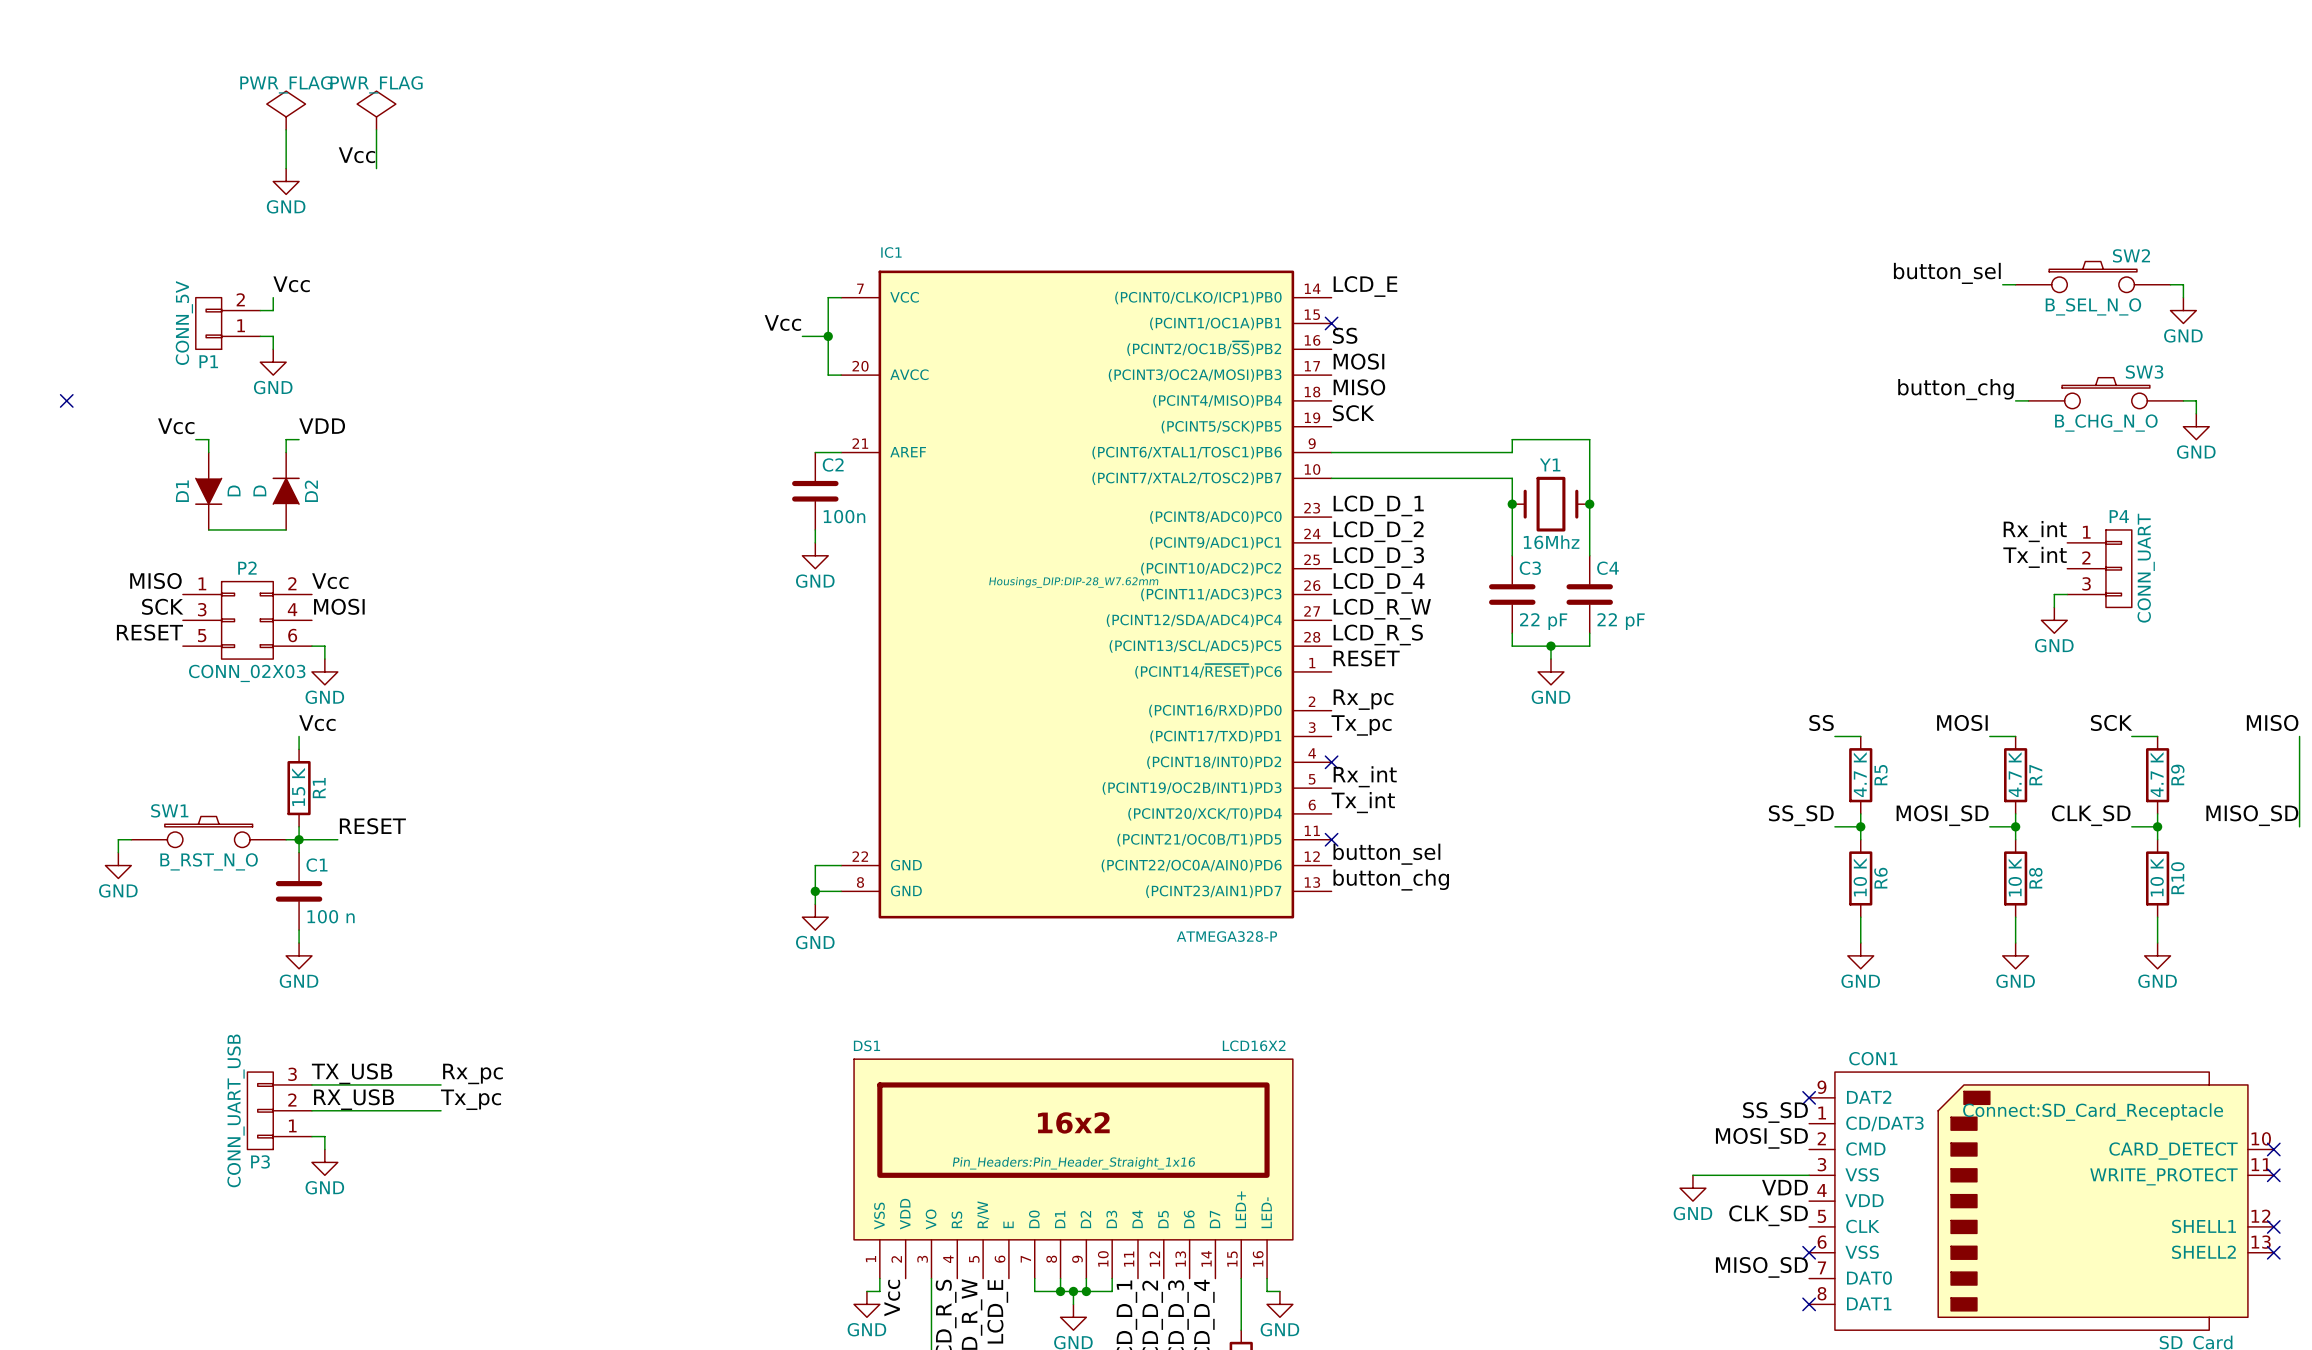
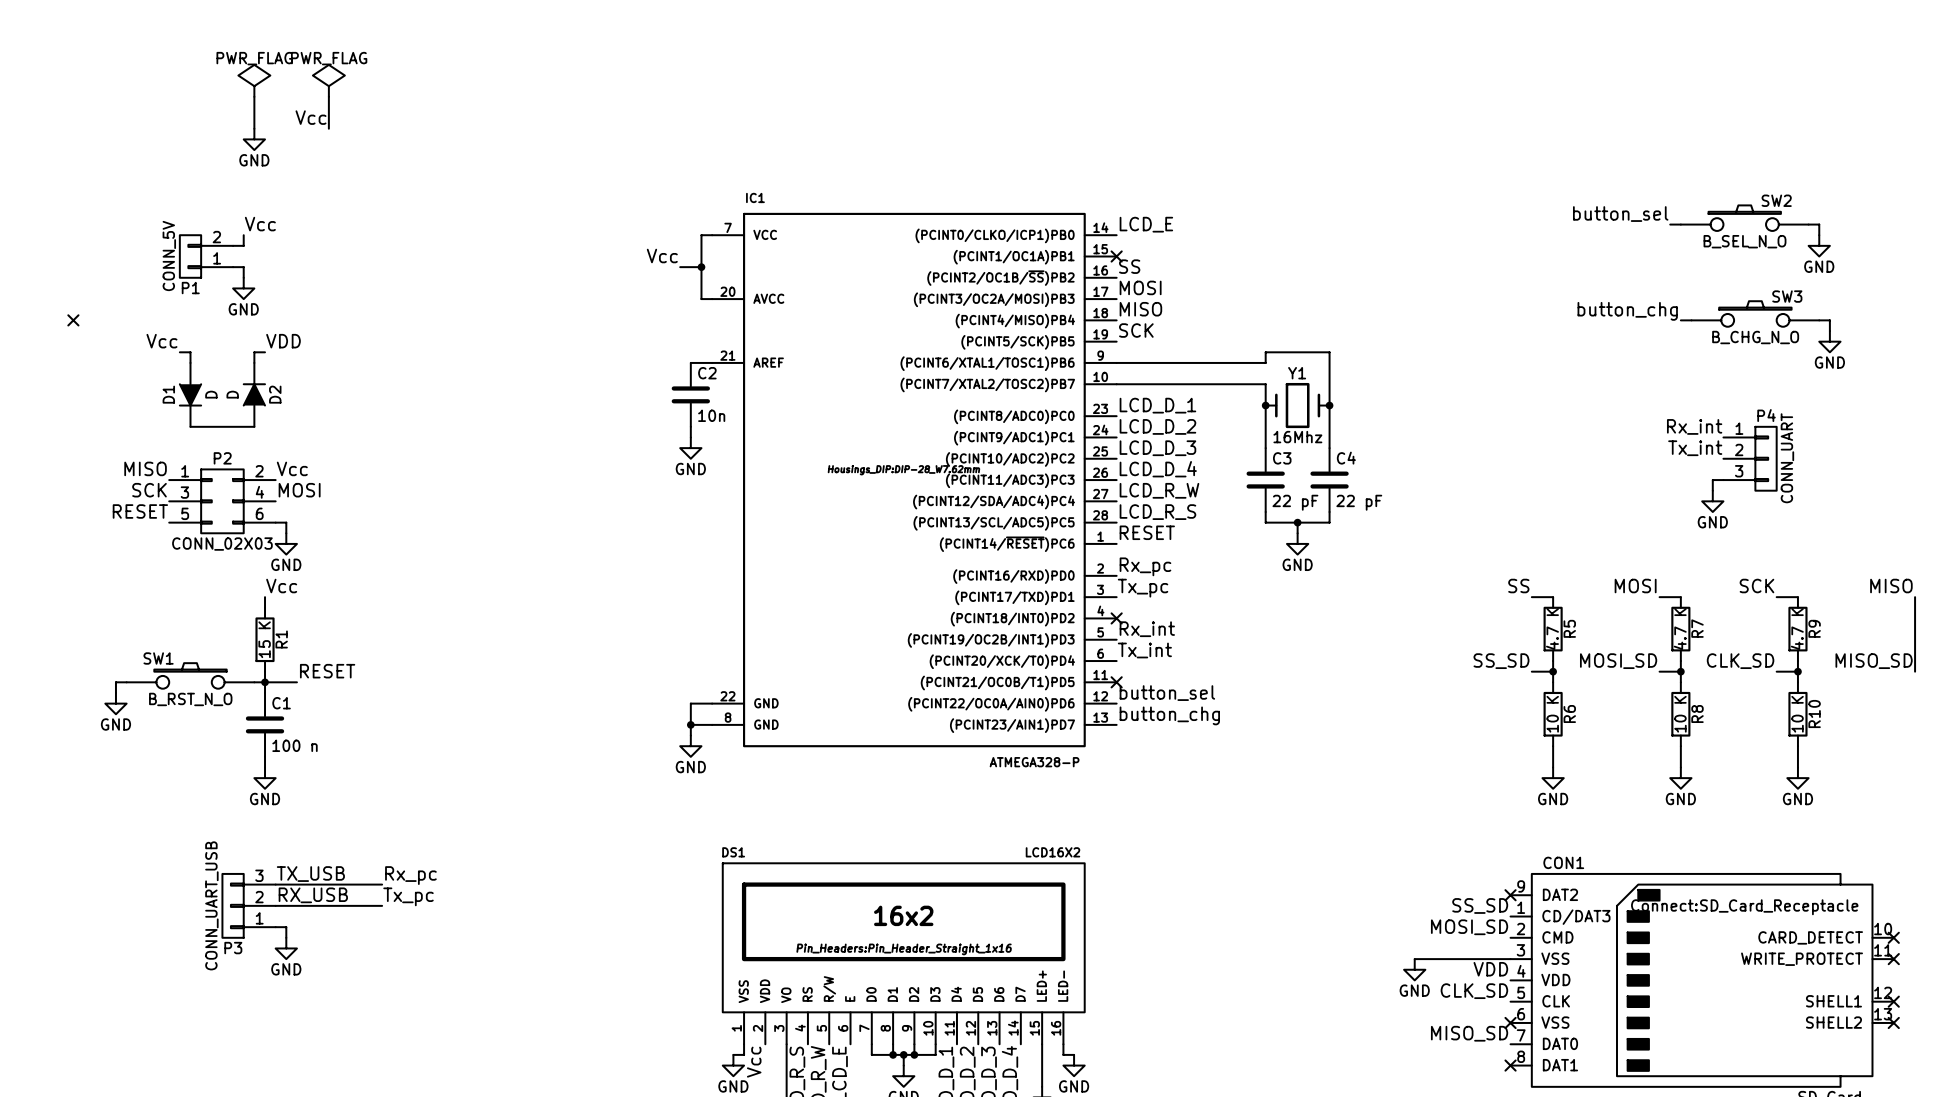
C2 value: 100n (844, 516) -> 10n (711, 415)

